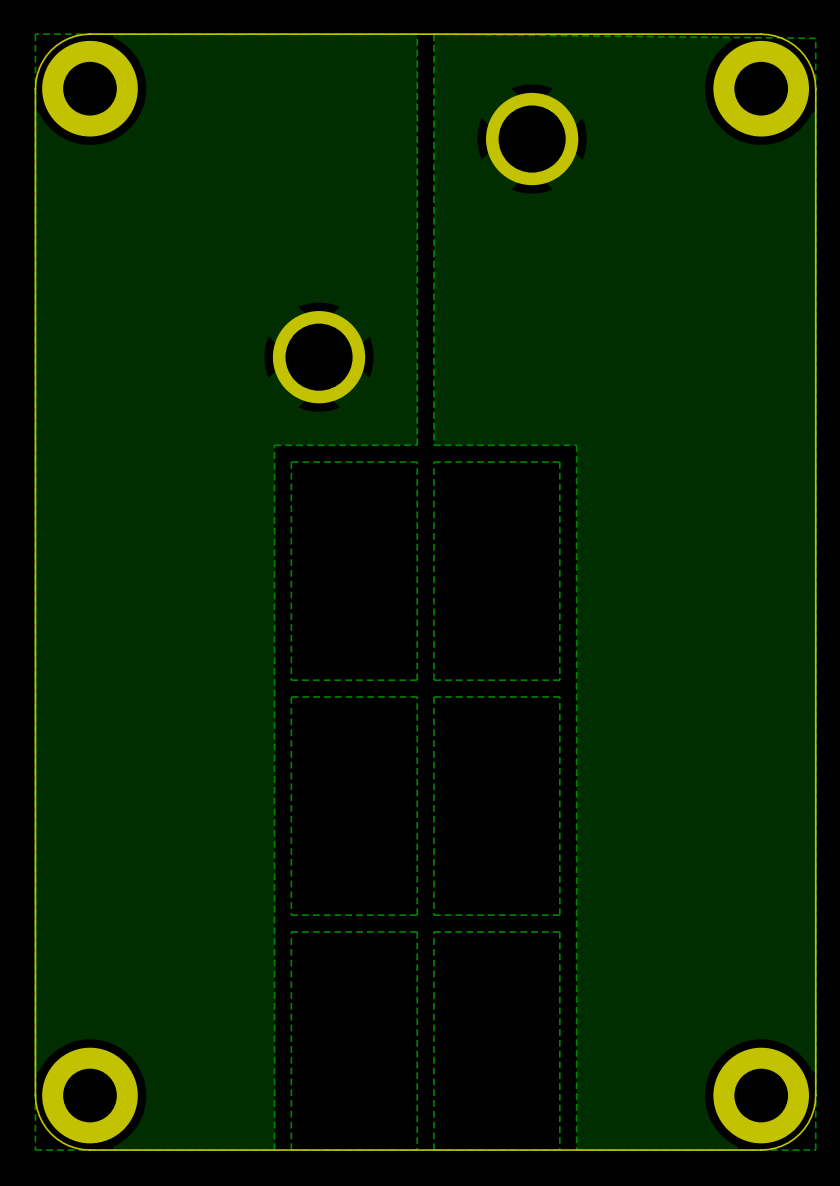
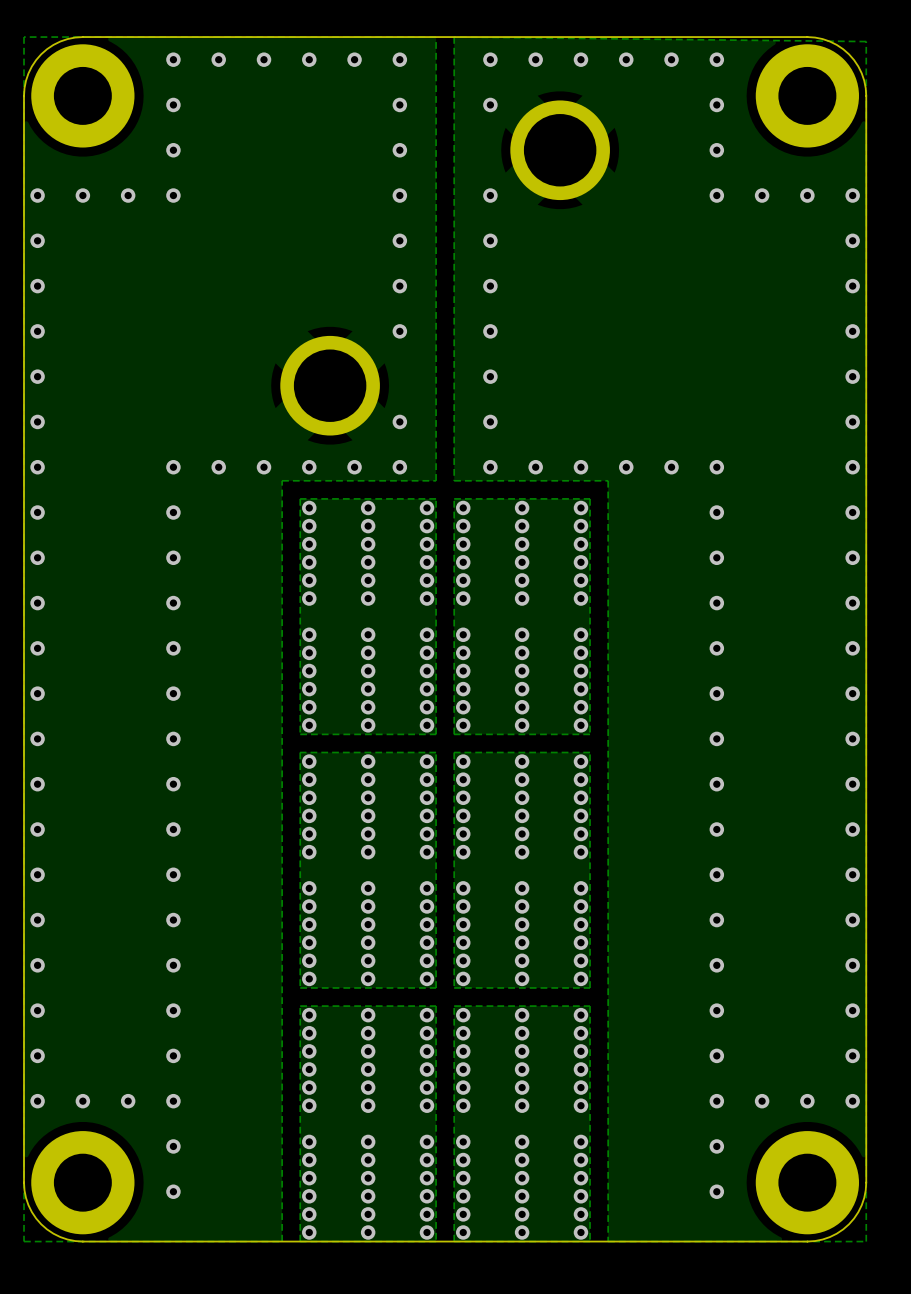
via: none -> (173, 59)
via: none -> (218, 59)
via: none -> (264, 59)
via: none -> (309, 59)
via: none -> (354, 59)
via: none -> (399, 59)
via: none -> (490, 59)
via: none -> (535, 59)
via: none -> (580, 59)
via: none -> (626, 59)
via: none -> (671, 59)
via: none -> (716, 59)
via: none -> (173, 104)
via: none -> (399, 104)
via: none -> (490, 104)
via: none -> (716, 104)
via: none -> (173, 150)
via: none -> (399, 150)
via: none -> (716, 150)
via: none -> (37, 195)
via: none -> (82, 195)
via: none -> (128, 195)
via: none -> (173, 195)
via: none -> (399, 195)
via: none -> (490, 195)
via: none -> (716, 195)
via: none -> (762, 195)
via: none -> (807, 195)
via: none -> (852, 195)
via: none -> (37, 240)
via: none -> (399, 240)
via: none -> (490, 240)
via: none -> (852, 240)
via: none -> (37, 286)
via: none -> (399, 286)
via: none -> (490, 286)
via: none -> (852, 286)
via: none -> (37, 331)
via: none -> (399, 331)
via: none -> (490, 331)
via: none -> (852, 331)
via: none -> (37, 376)
via: none -> (490, 376)
via: none -> (852, 376)
via: none -> (37, 421)
via: none -> (399, 421)
via: none -> (490, 421)
via: none -> (852, 421)
via: none -> (37, 467)
via: none -> (173, 467)
via: none -> (218, 467)
via: none -> (264, 467)
via: none -> (309, 467)
via: none -> (354, 467)
via: none -> (399, 467)
via: none -> (490, 467)
via: none -> (535, 467)
via: none -> (580, 467)
via: none -> (626, 467)
via: none -> (671, 467)
via: none -> (716, 467)
via: none -> (852, 467)
via: none -> (309, 507)
via: none -> (368, 507)
via: none -> (427, 507)
via: none -> (463, 507)
via: none -> (522, 507)
via: none -> (580, 507)
via: none -> (37, 512)
via: none -> (173, 512)
via: none -> (716, 512)
via: none -> (852, 512)
via: none -> (309, 526)
via: none -> (368, 526)
via: none -> (427, 526)
via: none -> (463, 526)
via: none -> (522, 526)
via: none -> (580, 526)
via: none -> (309, 544)
via: none -> (368, 544)
via: none -> (427, 544)
via: none -> (463, 544)
via: none -> (522, 544)
via: none -> (580, 544)
via: none -> (37, 557)
via: none -> (173, 557)
via: none -> (716, 557)
via: none -> (852, 557)
via: none -> (309, 562)
via: none -> (368, 562)
via: none -> (427, 562)
via: none -> (463, 562)
via: none -> (522, 562)
via: none -> (580, 562)
via: none -> (309, 580)
via: none -> (368, 580)
via: none -> (427, 580)
via: none -> (463, 580)
via: none -> (522, 580)
via: none -> (580, 580)
via: none -> (309, 598)
via: none -> (368, 598)
via: none -> (427, 598)
via: none -> (463, 598)
via: none -> (522, 598)
via: none -> (580, 598)
via: none -> (37, 603)
via: none -> (173, 603)
via: none -> (716, 603)
via: none -> (852, 603)
via: none -> (309, 634)
via: none -> (368, 634)
via: none -> (427, 634)
via: none -> (463, 634)
via: none -> (522, 634)
via: none -> (580, 634)
via: none -> (37, 648)
via: none -> (173, 648)
via: none -> (716, 648)
via: none -> (852, 648)
via: none -> (309, 652)
via: none -> (368, 652)
via: none -> (427, 652)
via: none -> (463, 652)
via: none -> (522, 652)
via: none -> (580, 652)
via: none -> (309, 670)
via: none -> (368, 670)
via: none -> (427, 670)
via: none -> (463, 670)
via: none -> (522, 670)
via: none -> (580, 670)
via: none -> (309, 689)
via: none -> (368, 689)
via: none -> (427, 689)
via: none -> (463, 689)
via: none -> (522, 689)
via: none -> (580, 689)
via: none -> (37, 693)
via: none -> (173, 693)
via: none -> (716, 693)
via: none -> (852, 693)
via: none -> (309, 707)
via: none -> (368, 707)
via: none -> (427, 707)
via: none -> (463, 707)
via: none -> (522, 707)
via: none -> (580, 707)
via: none -> (309, 725)
via: none -> (368, 725)
via: none -> (427, 725)
via: none -> (463, 725)
via: none -> (522, 725)
via: none -> (580, 725)
via: none -> (37, 738)
via: none -> (173, 738)
via: none -> (716, 738)
via: none -> (852, 738)
via: none -> (309, 761)
via: none -> (368, 761)
via: none -> (427, 761)
via: none -> (463, 761)
via: none -> (522, 761)
via: none -> (580, 761)
via: none -> (309, 779)
via: none -> (368, 779)
via: none -> (427, 779)
via: none -> (463, 779)
via: none -> (522, 779)
via: none -> (580, 779)
via: none -> (37, 784)
via: none -> (173, 784)
via: none -> (716, 784)
via: none -> (852, 784)
via: none -> (309, 797)
via: none -> (368, 797)
via: none -> (427, 797)
via: none -> (463, 797)
via: none -> (522, 797)
via: none -> (580, 797)
via: none -> (309, 815)
via: none -> (368, 815)
via: none -> (427, 815)
via: none -> (463, 815)
via: none -> (522, 815)
via: none -> (580, 815)
via: none -> (37, 829)
via: none -> (173, 829)
via: none -> (716, 829)
via: none -> (852, 829)
via: none -> (309, 834)
via: none -> (368, 834)
via: none -> (427, 834)
via: none -> (463, 834)
via: none -> (522, 834)
via: none -> (580, 834)
via: none -> (309, 852)
via: none -> (368, 852)
via: none -> (427, 852)
via: none -> (463, 852)
via: none -> (522, 852)
via: none -> (580, 852)
via: none -> (37, 874)
via: none -> (173, 874)
via: none -> (716, 874)
via: none -> (852, 874)
via: none -> (309, 888)
via: none -> (368, 888)
via: none -> (427, 888)
via: none -> (463, 888)
via: none -> (522, 888)
via: none -> (580, 888)
via: none -> (309, 906)
via: none -> (368, 906)
via: none -> (427, 906)
via: none -> (463, 906)
via: none -> (522, 906)
via: none -> (580, 906)
via: none -> (37, 920)
via: none -> (173, 920)
via: none -> (716, 920)
via: none -> (852, 920)
via: none -> (309, 924)
via: none -> (368, 924)
via: none -> (427, 924)
via: none -> (463, 924)
via: none -> (522, 924)
via: none -> (580, 924)
via: none -> (309, 942)
via: none -> (368, 942)
via: none -> (427, 942)
via: none -> (463, 942)
via: none -> (522, 942)
via: none -> (580, 942)
via: none -> (309, 960)
via: none -> (368, 960)
via: none -> (427, 960)
via: none -> (463, 960)
via: none -> (522, 960)
via: none -> (580, 960)
via: none -> (37, 965)
via: none -> (173, 965)
via: none -> (716, 965)
via: none -> (852, 965)
via: none -> (309, 978)
via: none -> (368, 978)
via: none -> (427, 978)
via: none -> (463, 978)
via: none -> (522, 978)
via: none -> (580, 978)
via: none -> (37, 1010)
via: none -> (173, 1010)
via: none -> (716, 1010)
via: none -> (852, 1010)
via: none -> (309, 1015)
via: none -> (368, 1015)
via: none -> (427, 1015)
via: none -> (463, 1015)
via: none -> (522, 1015)
via: none -> (580, 1015)
via: none -> (309, 1033)
via: none -> (368, 1033)
via: none -> (427, 1033)
via: none -> (463, 1033)
via: none -> (522, 1033)
via: none -> (580, 1033)
via: none -> (309, 1051)
via: none -> (368, 1051)
via: none -> (427, 1051)
via: none -> (463, 1051)
via: none -> (522, 1051)
via: none -> (580, 1051)
via: none -> (37, 1055)
via: none -> (173, 1055)
via: none -> (716, 1055)
via: none -> (852, 1055)
via: none -> (309, 1069)
via: none -> (368, 1069)
via: none -> (427, 1069)
via: none -> (463, 1069)
via: none -> (522, 1069)
via: none -> (580, 1069)
via: none -> (309, 1087)
via: none -> (368, 1087)
via: none -> (427, 1087)
via: none -> (463, 1087)
via: none -> (522, 1087)
via: none -> (580, 1087)
via: none -> (37, 1101)
via: none -> (82, 1101)
via: none -> (128, 1101)
via: none -> (173, 1101)
via: none -> (716, 1101)
via: none -> (762, 1101)
via: none -> (807, 1101)
via: none -> (852, 1101)
via: none -> (309, 1105)
via: none -> (368, 1105)
via: none -> (427, 1105)
via: none -> (463, 1105)
via: none -> (522, 1105)
via: none -> (580, 1105)
via: none -> (309, 1141)
via: none -> (368, 1141)
via: none -> (427, 1141)
via: none -> (463, 1141)
via: none -> (522, 1141)
via: none -> (580, 1141)
via: none -> (173, 1146)
via: none -> (716, 1146)
via: none -> (309, 1160)
via: none -> (368, 1160)
via: none -> (427, 1160)
via: none -> (463, 1160)
via: none -> (522, 1160)
via: none -> (580, 1160)
via: none -> (309, 1178)
via: none -> (368, 1178)
via: none -> (427, 1178)
via: none -> (463, 1178)
via: none -> (522, 1178)
via: none -> (580, 1178)
via: none -> (173, 1191)
via: none -> (716, 1191)
via: none -> (309, 1196)
via: none -> (368, 1196)
via: none -> (427, 1196)
via: none -> (463, 1196)
via: none -> (522, 1196)
via: none -> (580, 1196)
via: none -> (309, 1214)
via: none -> (368, 1214)
via: none -> (427, 1214)
via: none -> (463, 1214)
via: none -> (522, 1214)
via: none -> (580, 1214)
via: none -> (309, 1232)
via: none -> (368, 1232)
via: none -> (427, 1232)
via: none -> (463, 1232)
via: none -> (522, 1232)
via: none -> (580, 1232)

